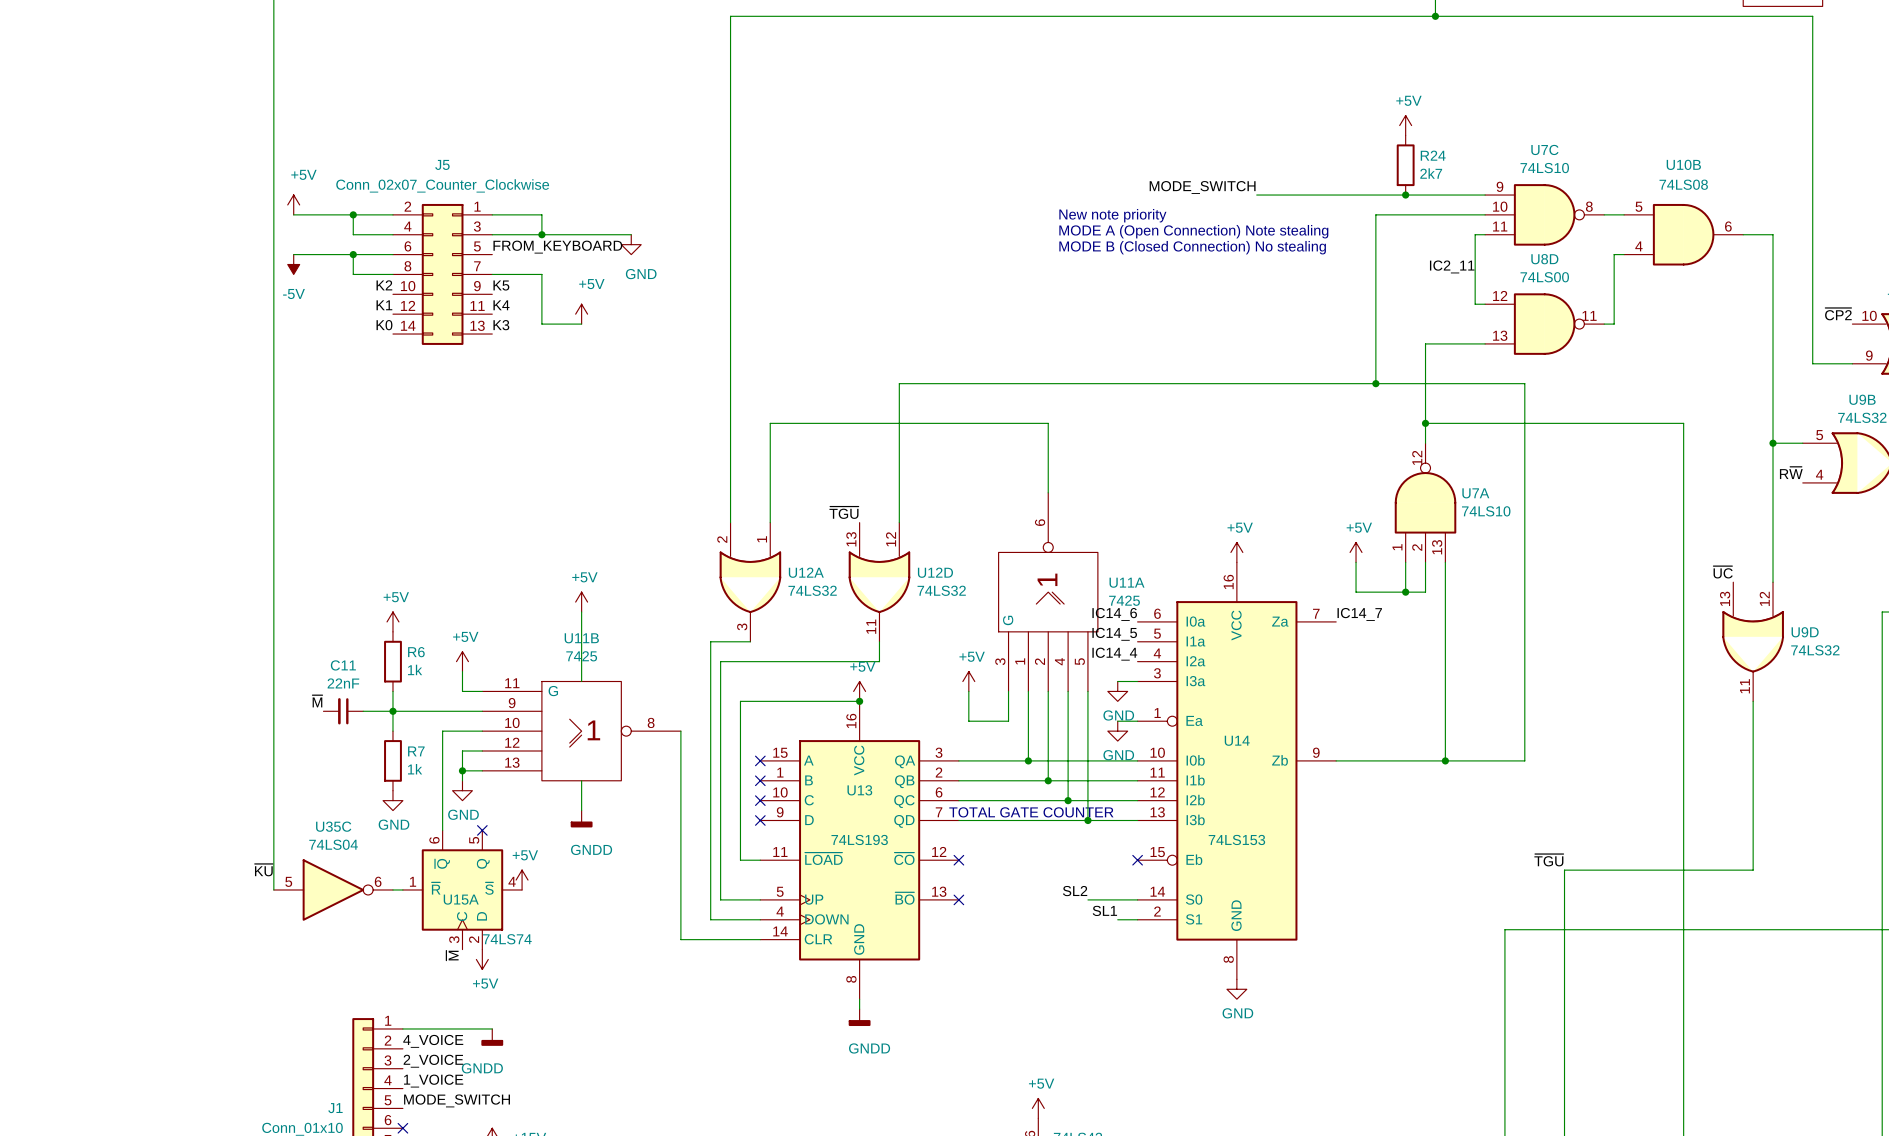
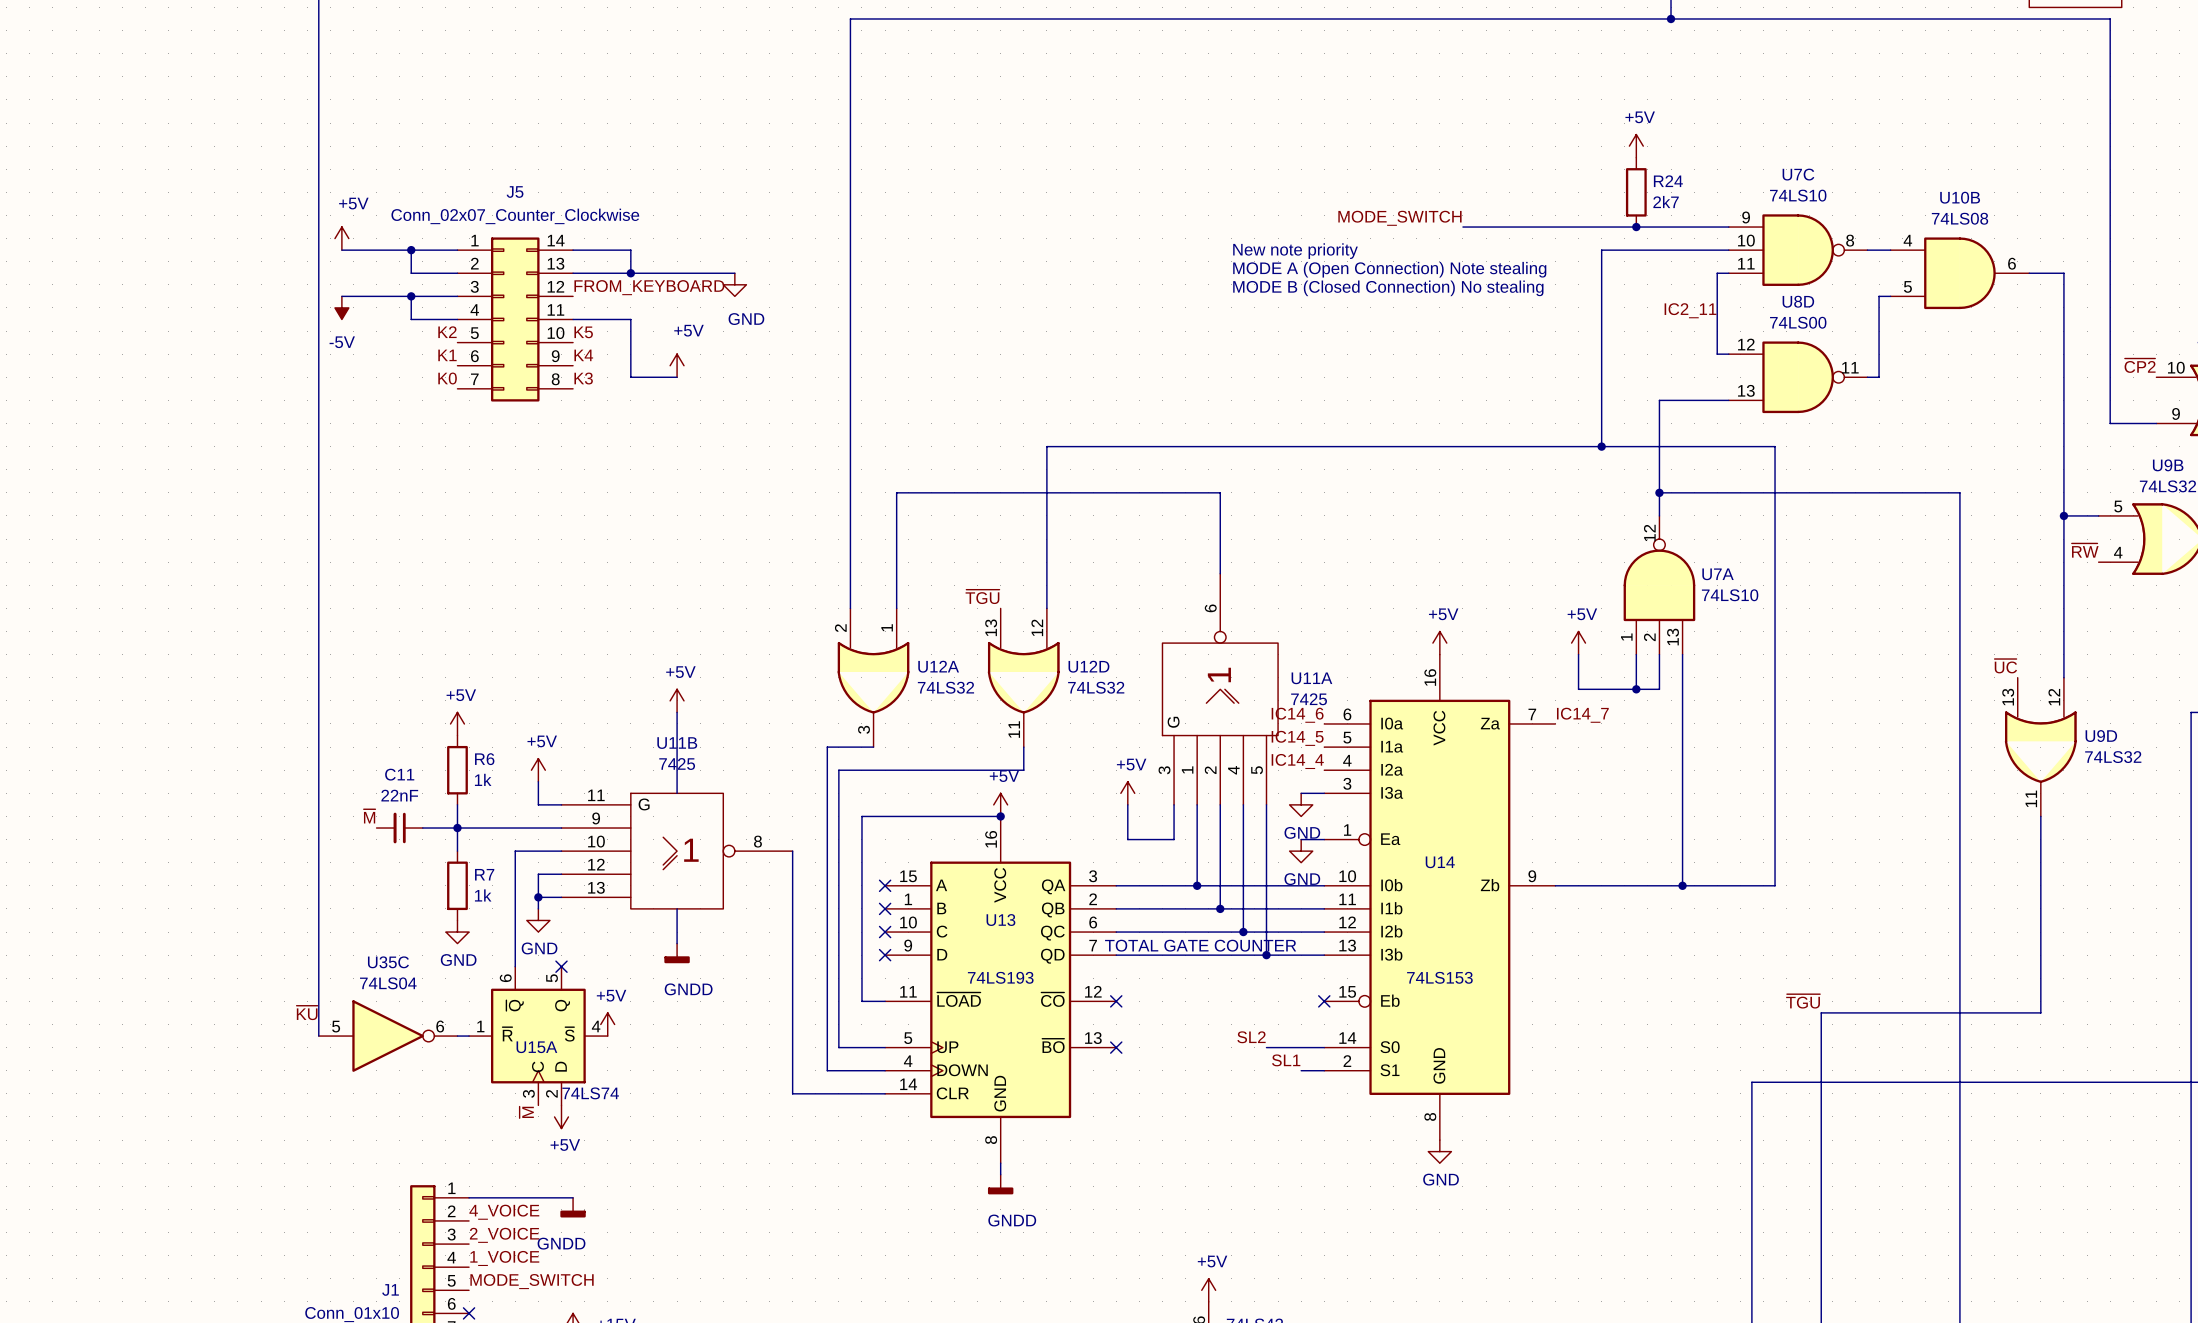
J5 symbol: [392, 203, 493, 345] -> [457, 237, 574, 402]
U10B flip: as is (1683, 234) -> up-down (1959, 273)
label: R~{W} (1791, 472) -> ~{RW} (2085, 550)

